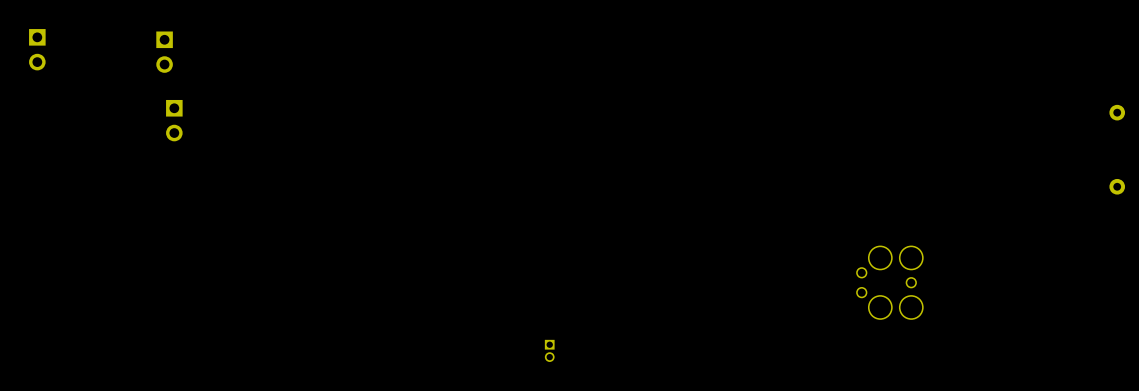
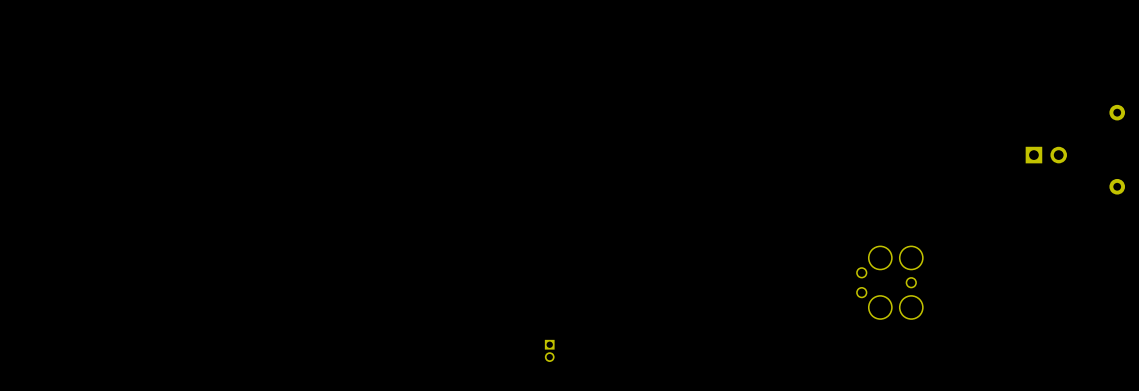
part: (37, 49) -> none
part: (164, 52) -> none
part: (174, 120) -> none
part: none -> (1046, 155)

